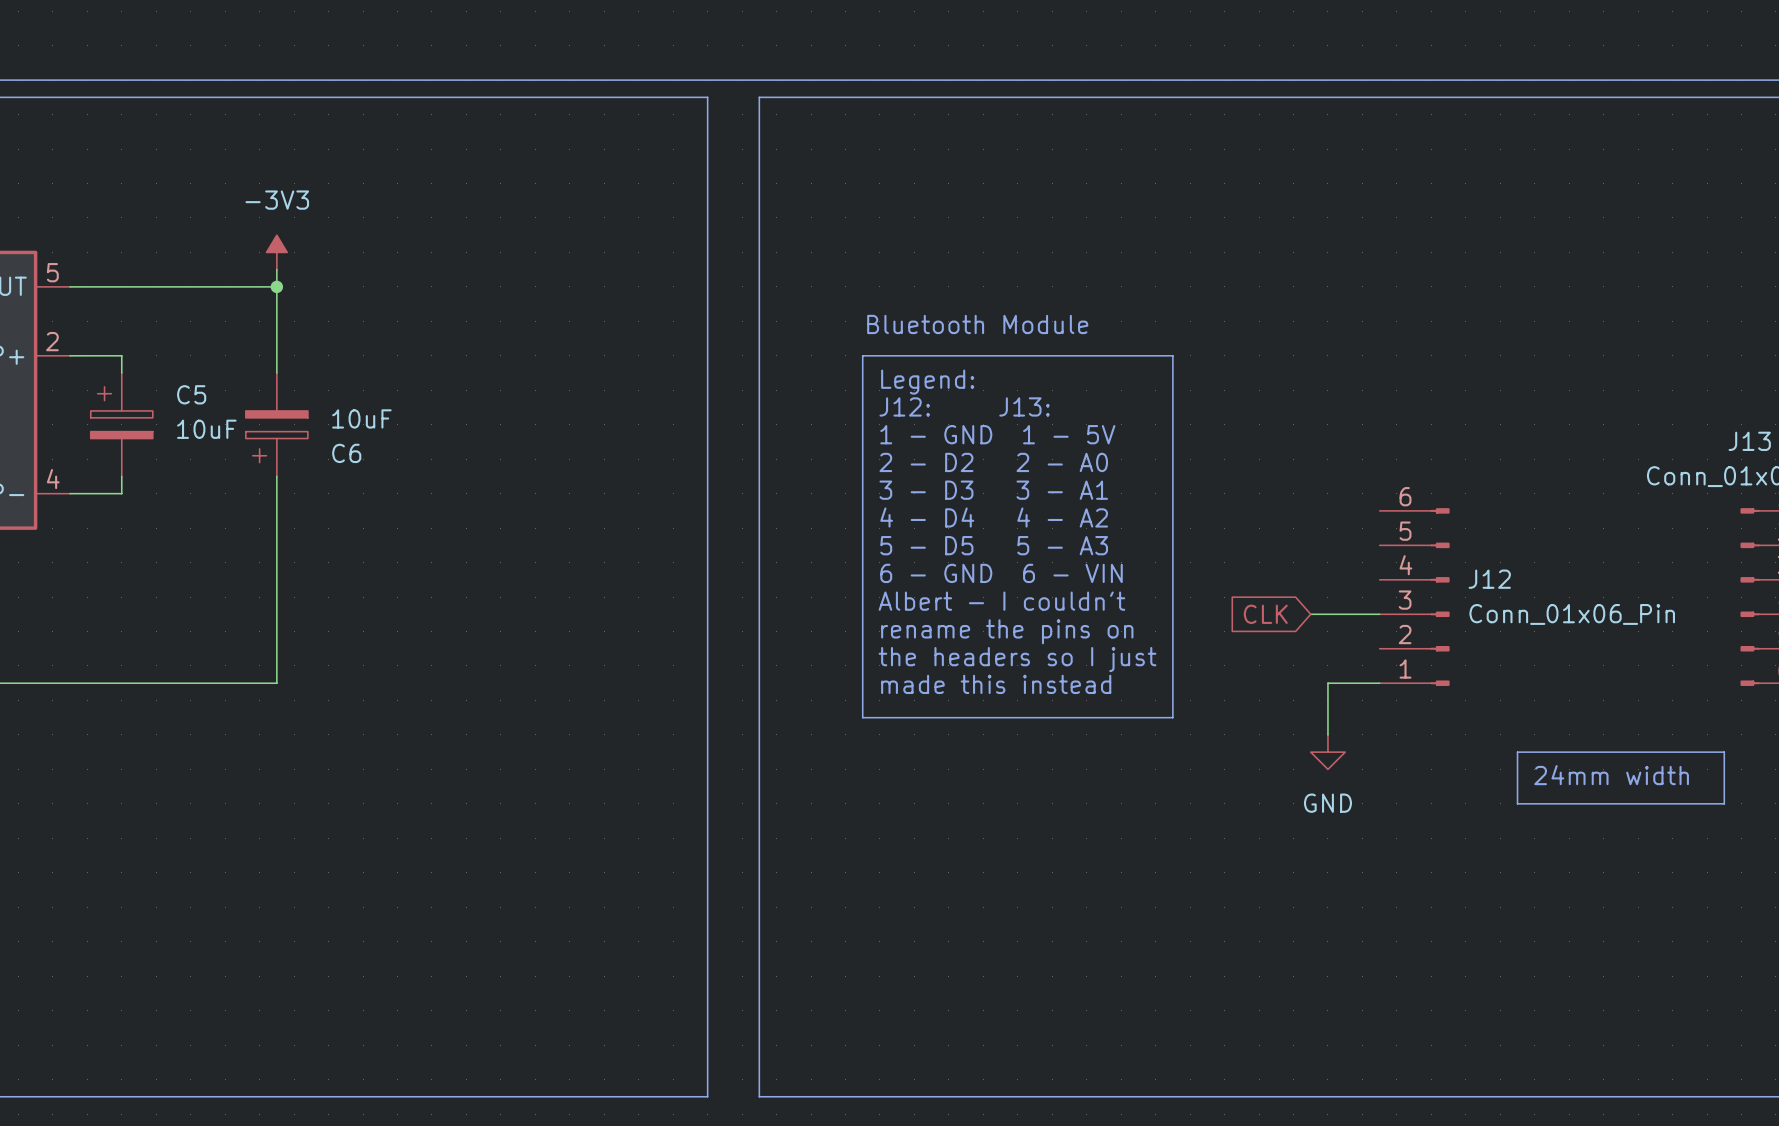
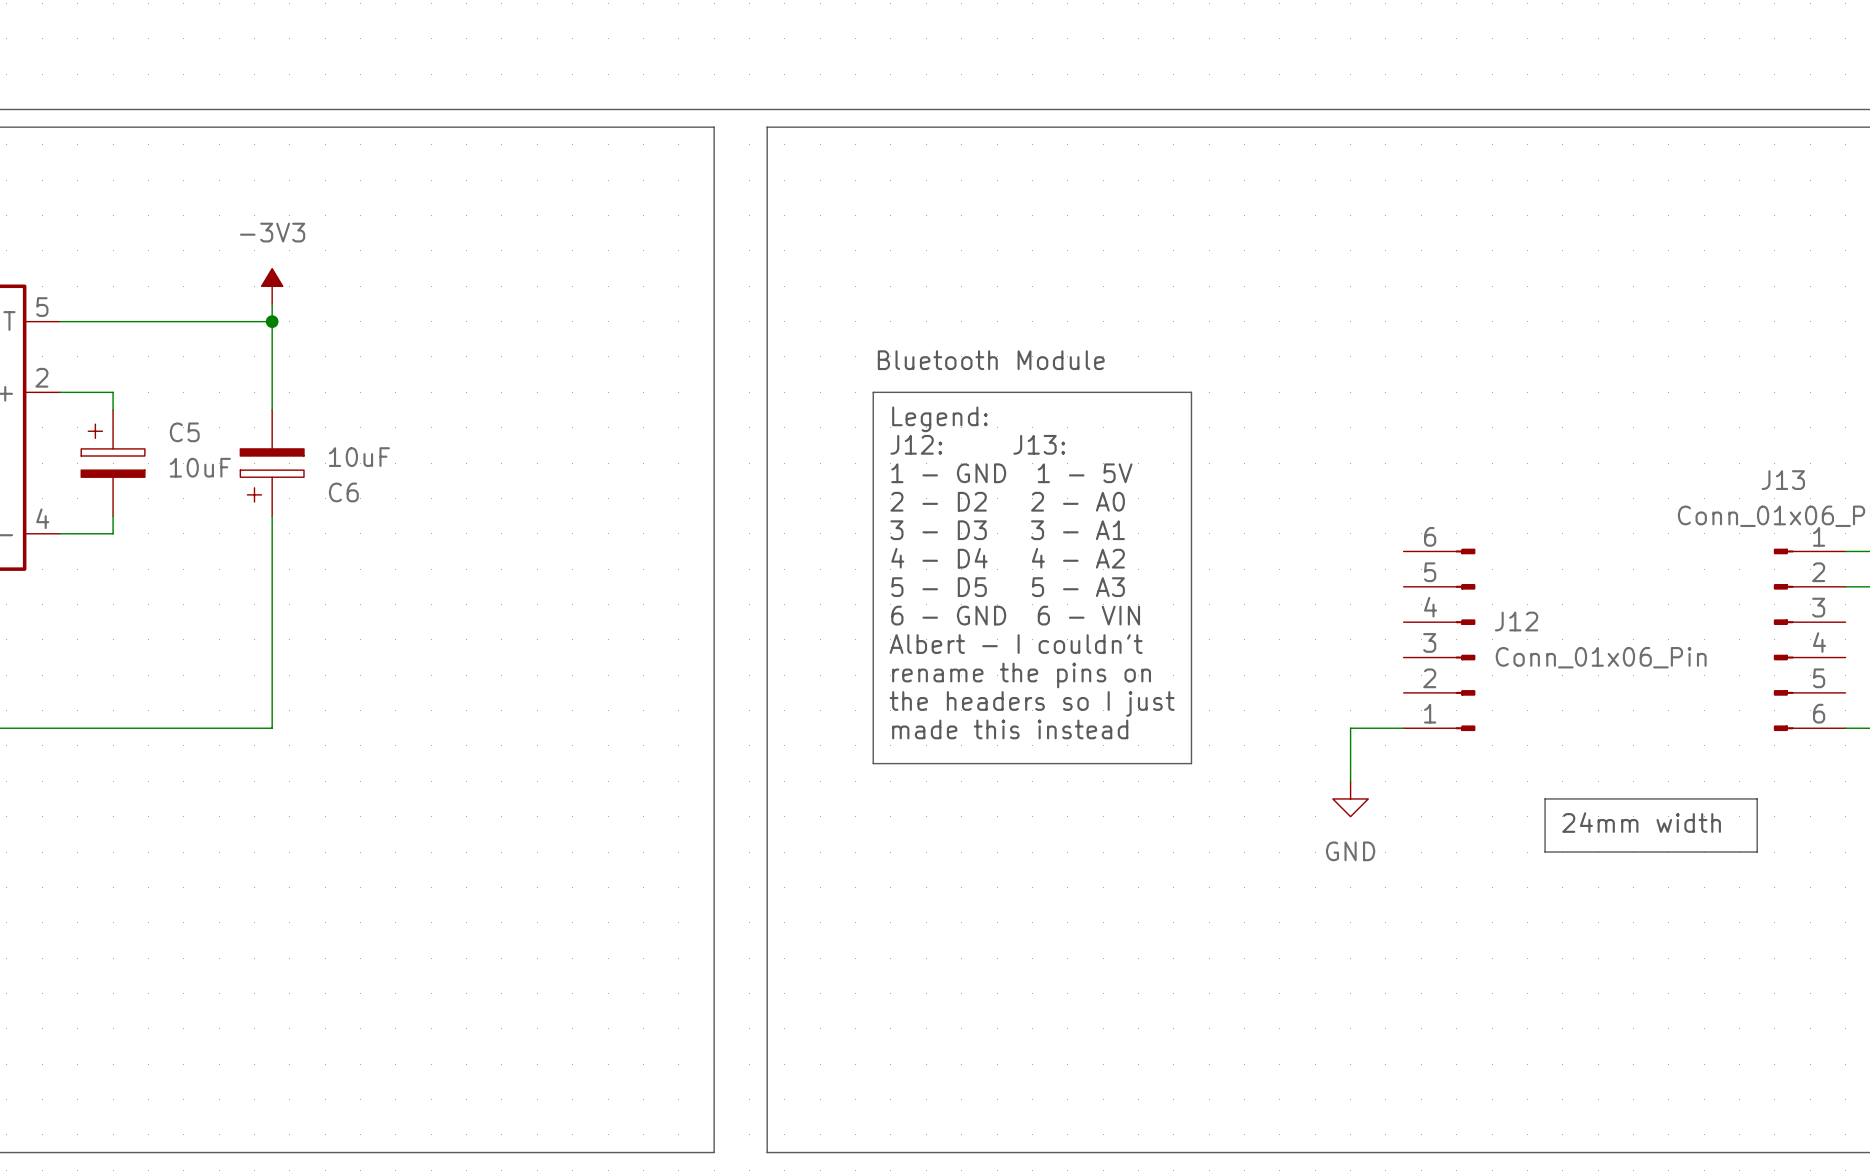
global label: CLK (1265, 614) -> none
wire: (1310, 614) (1379, 614) -> none

